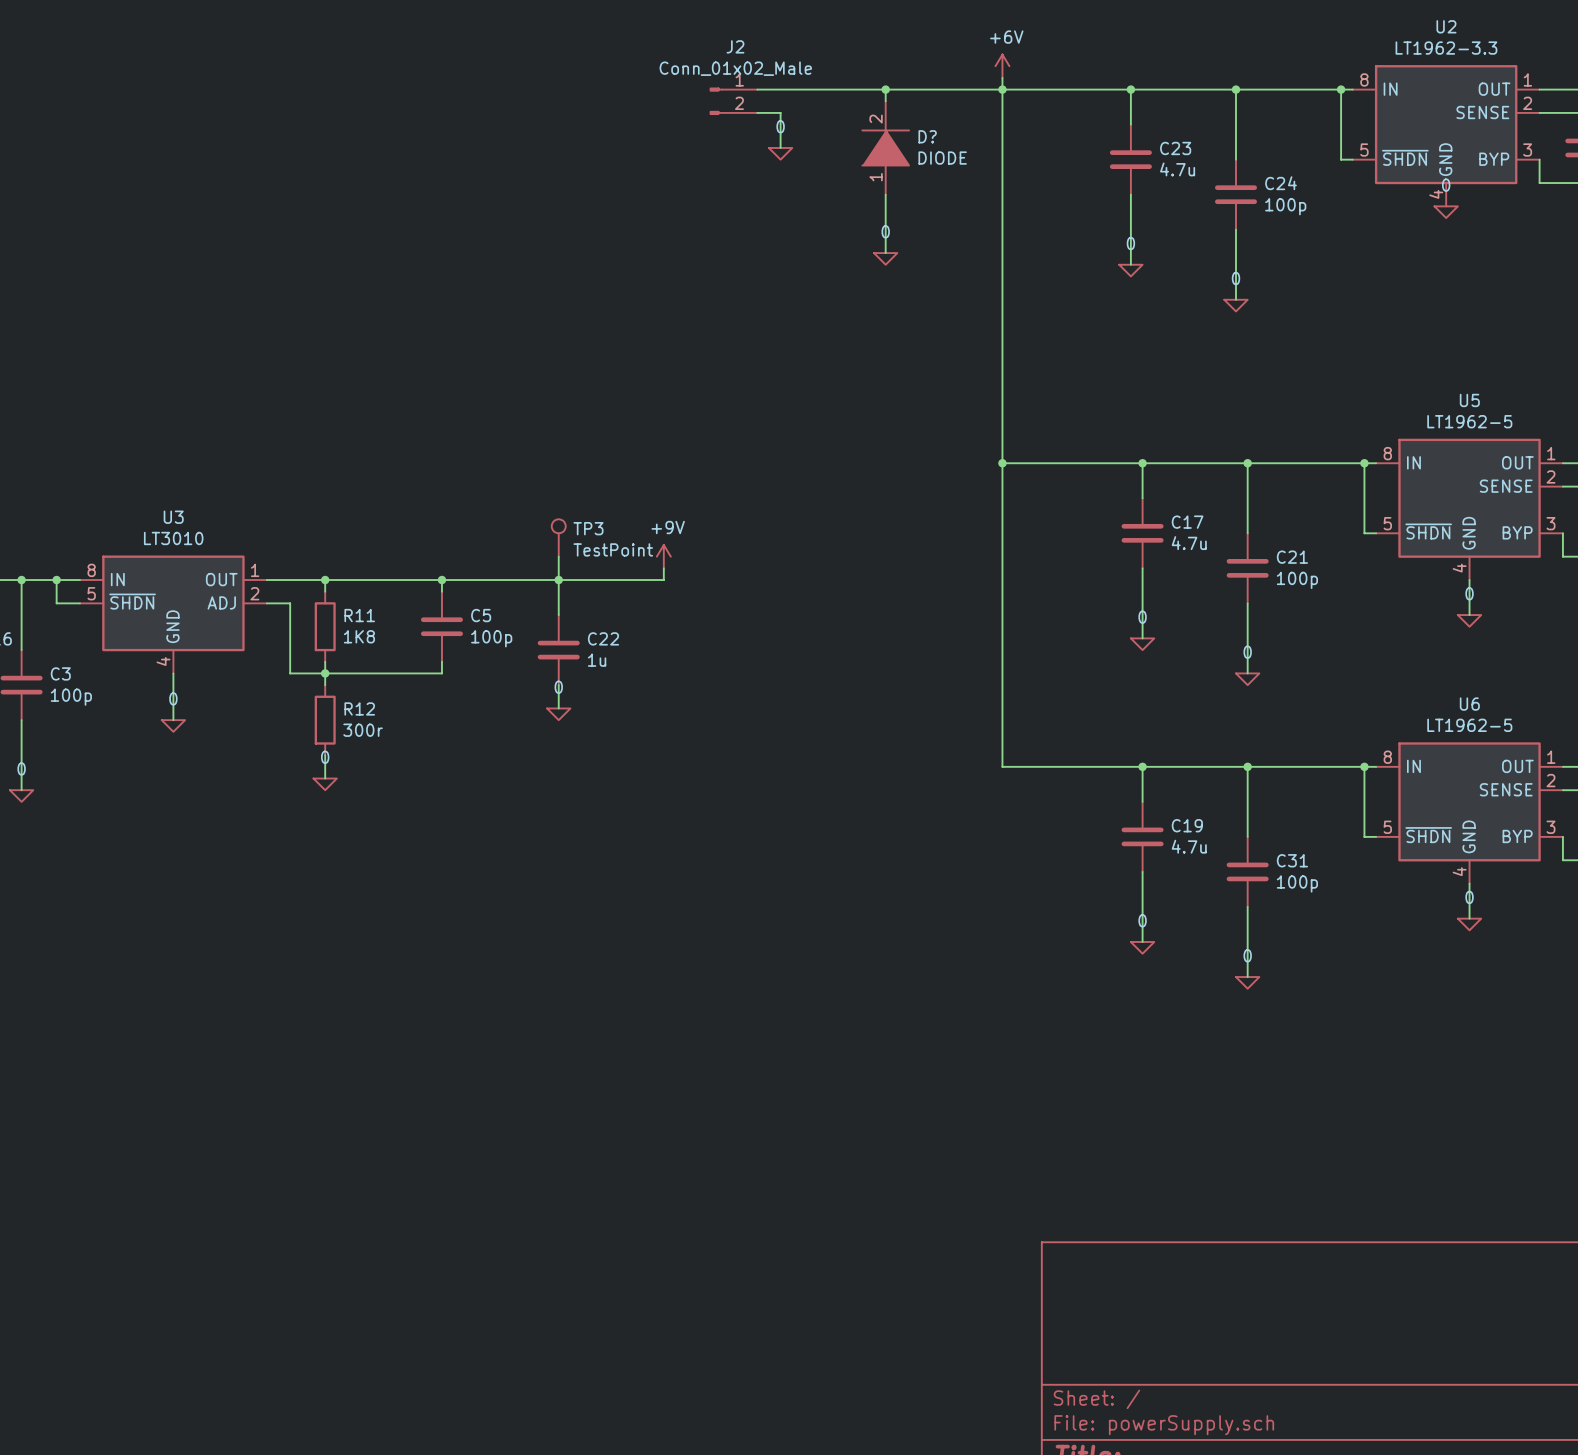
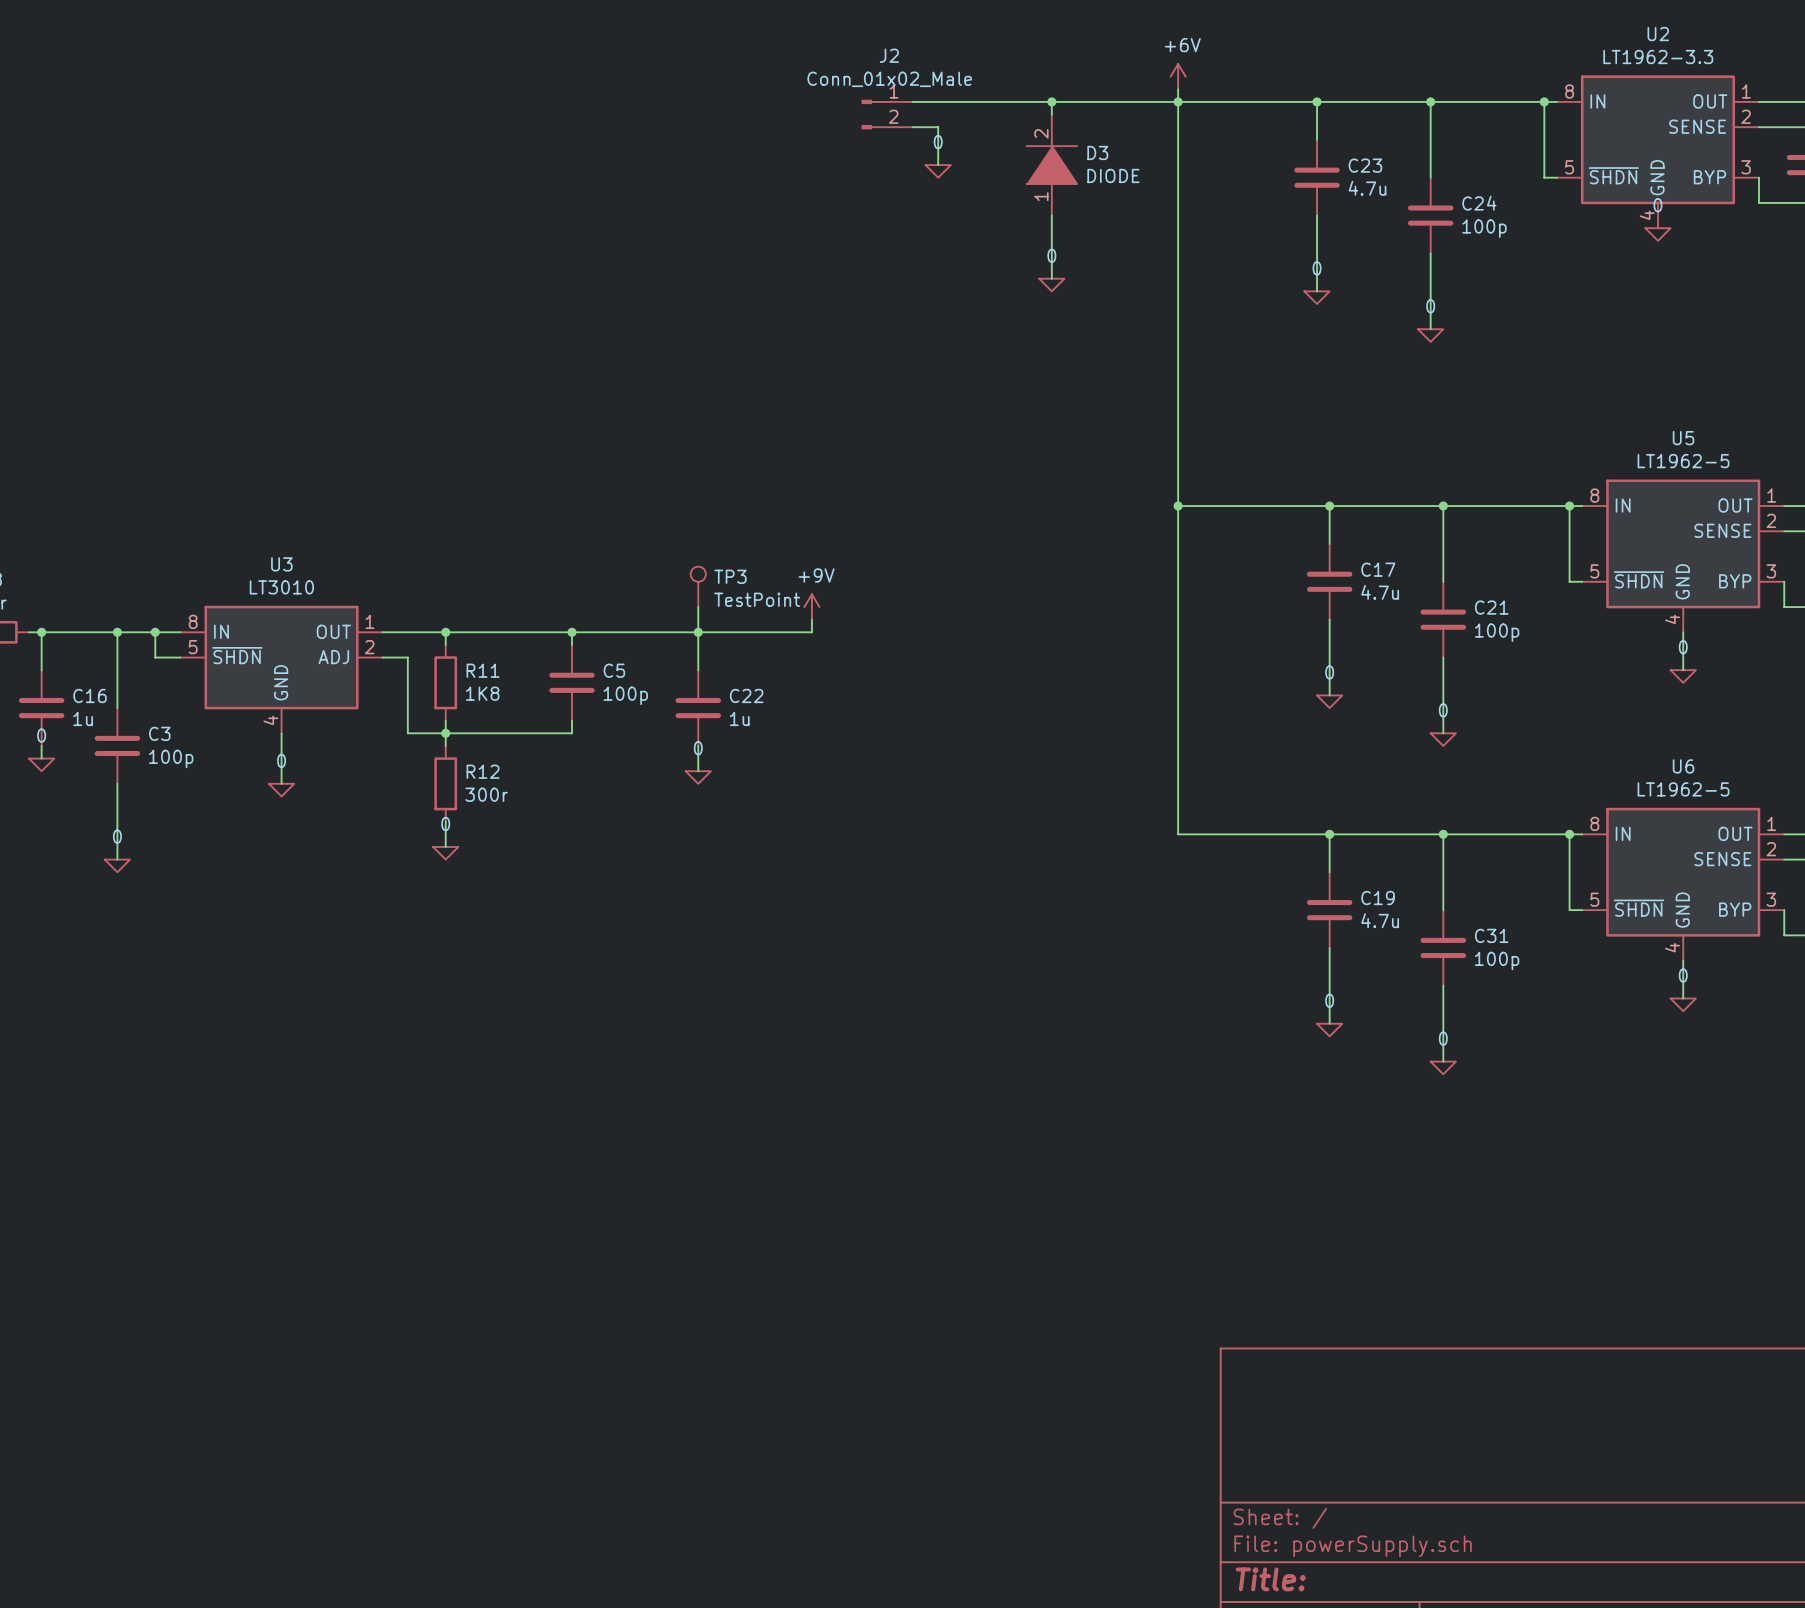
D? name: D? (927, 136) -> D3 (1097, 152)

